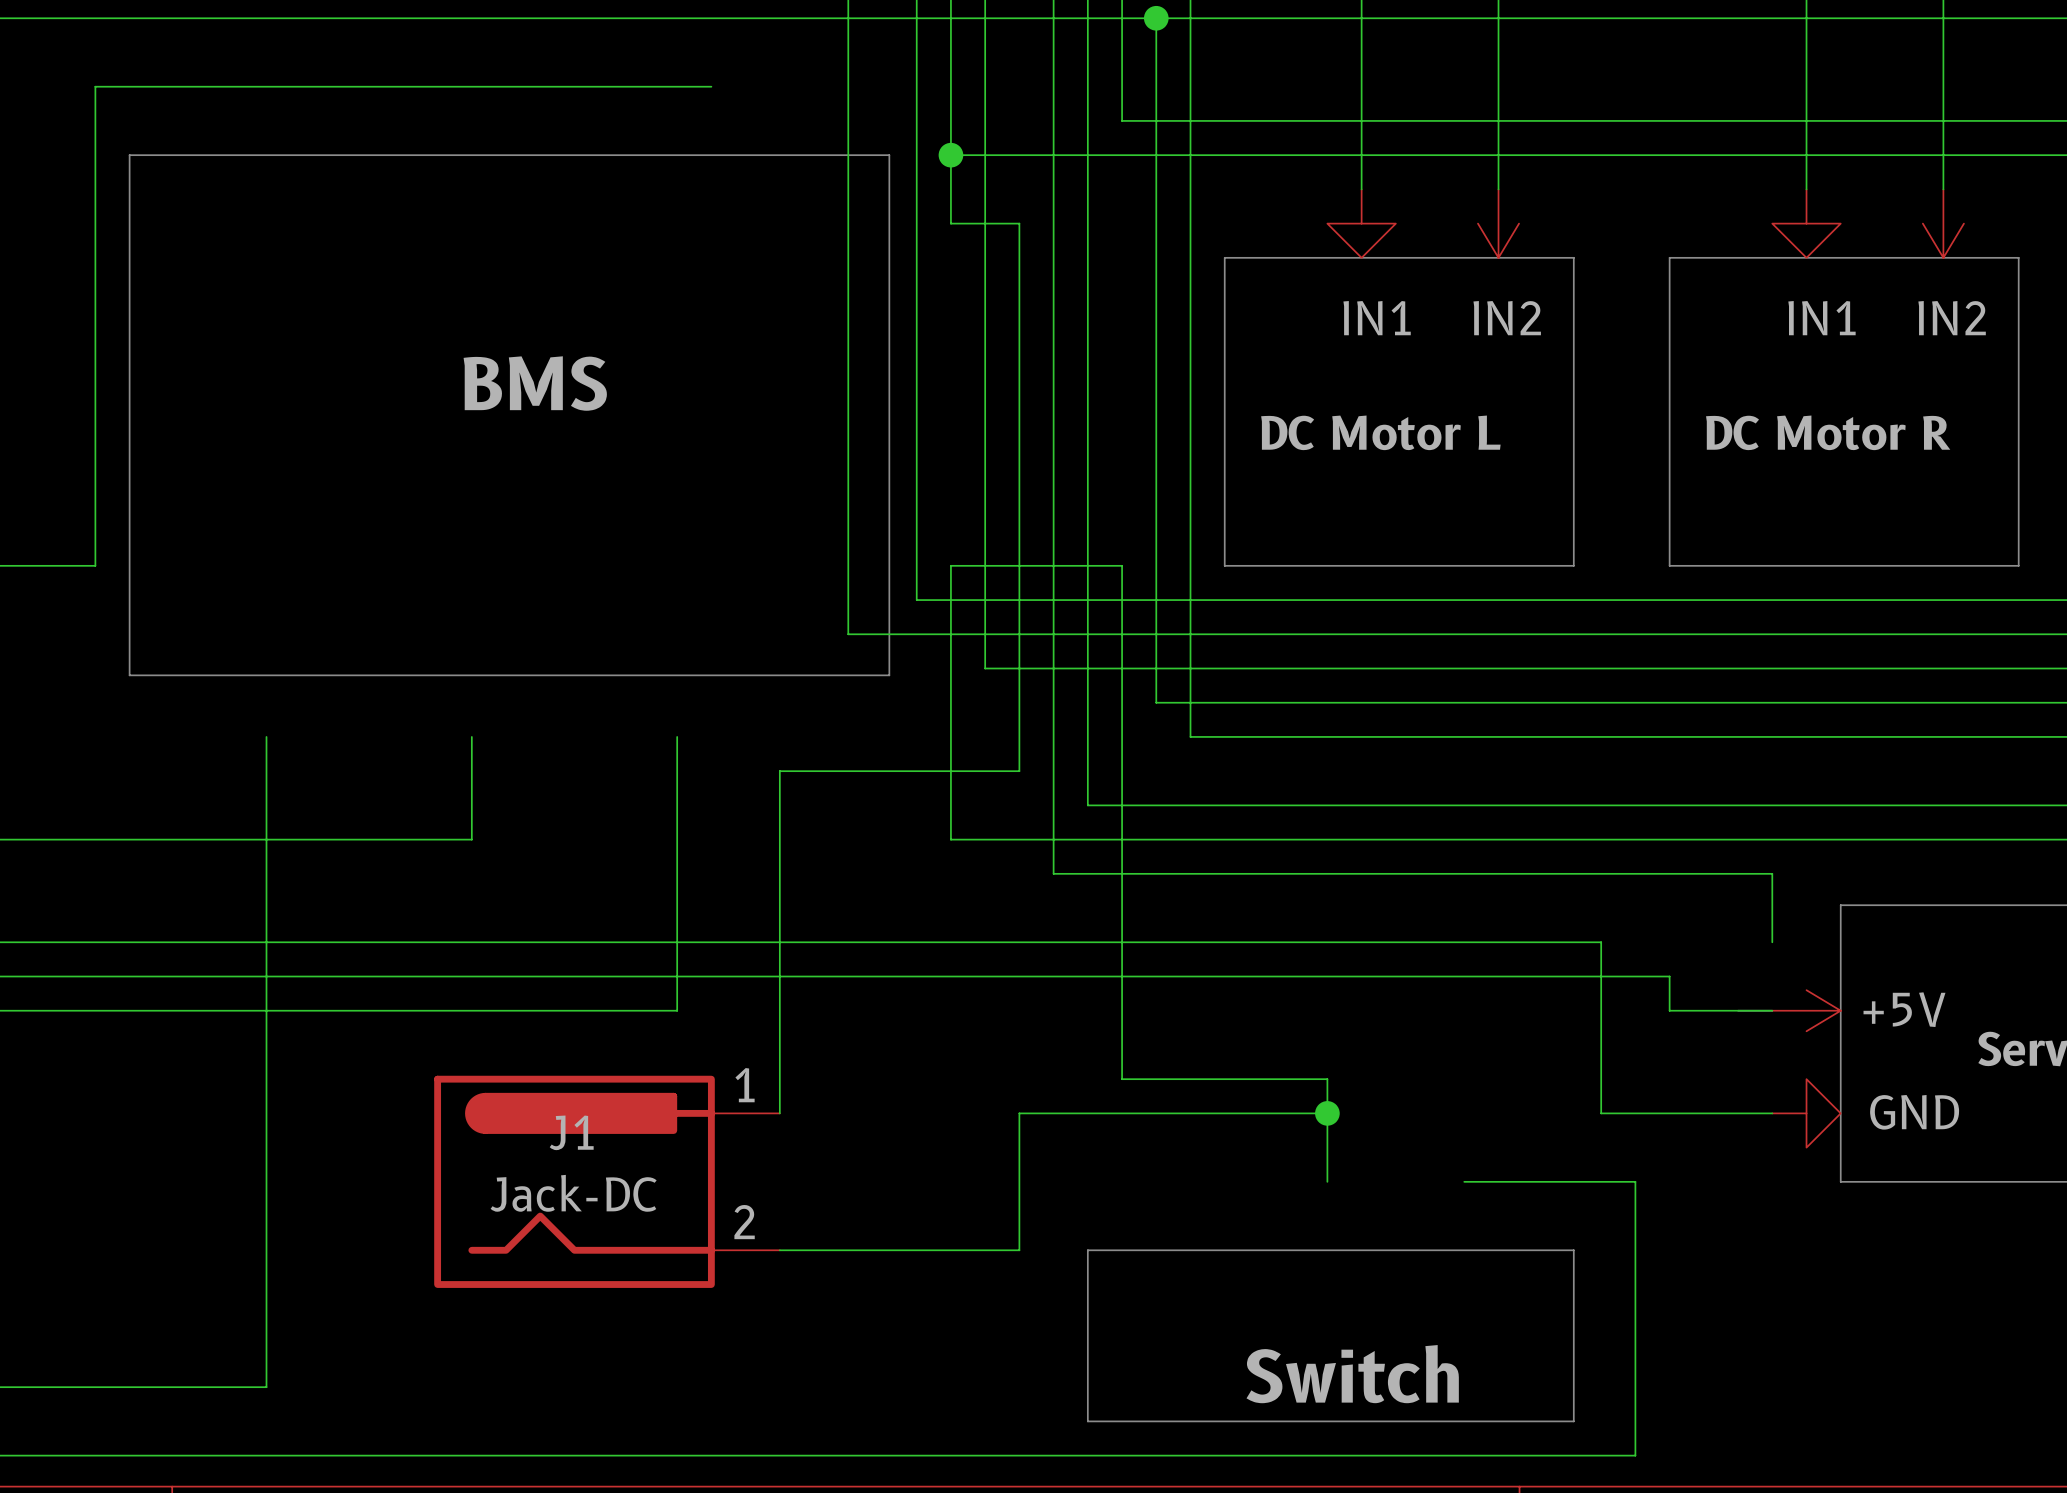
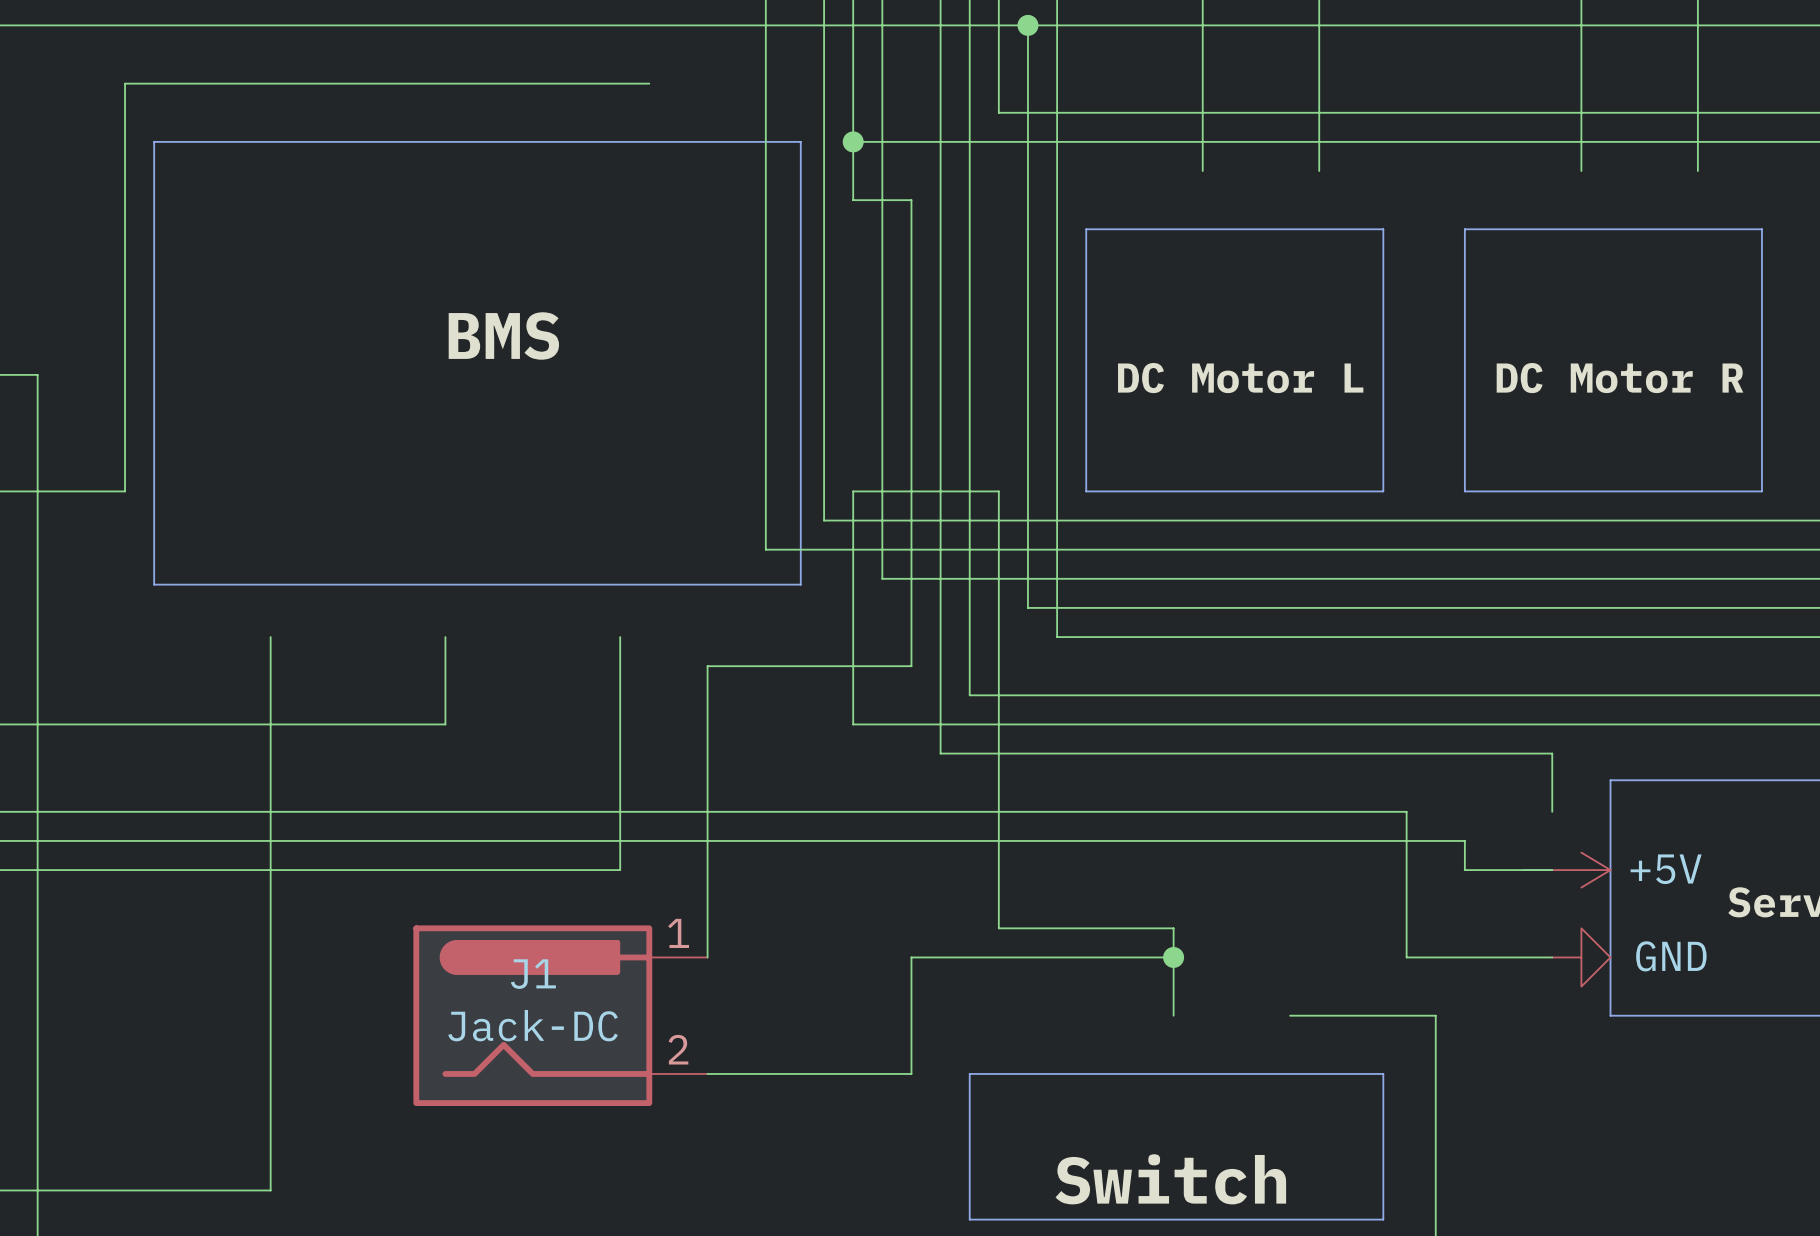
power symbol: IN1 (1361, 223) -> none
power symbol: IN2 (1498, 223) -> none
power symbol: IN1 (1806, 223) -> none
power symbol: IN2 (1943, 223) -> none

